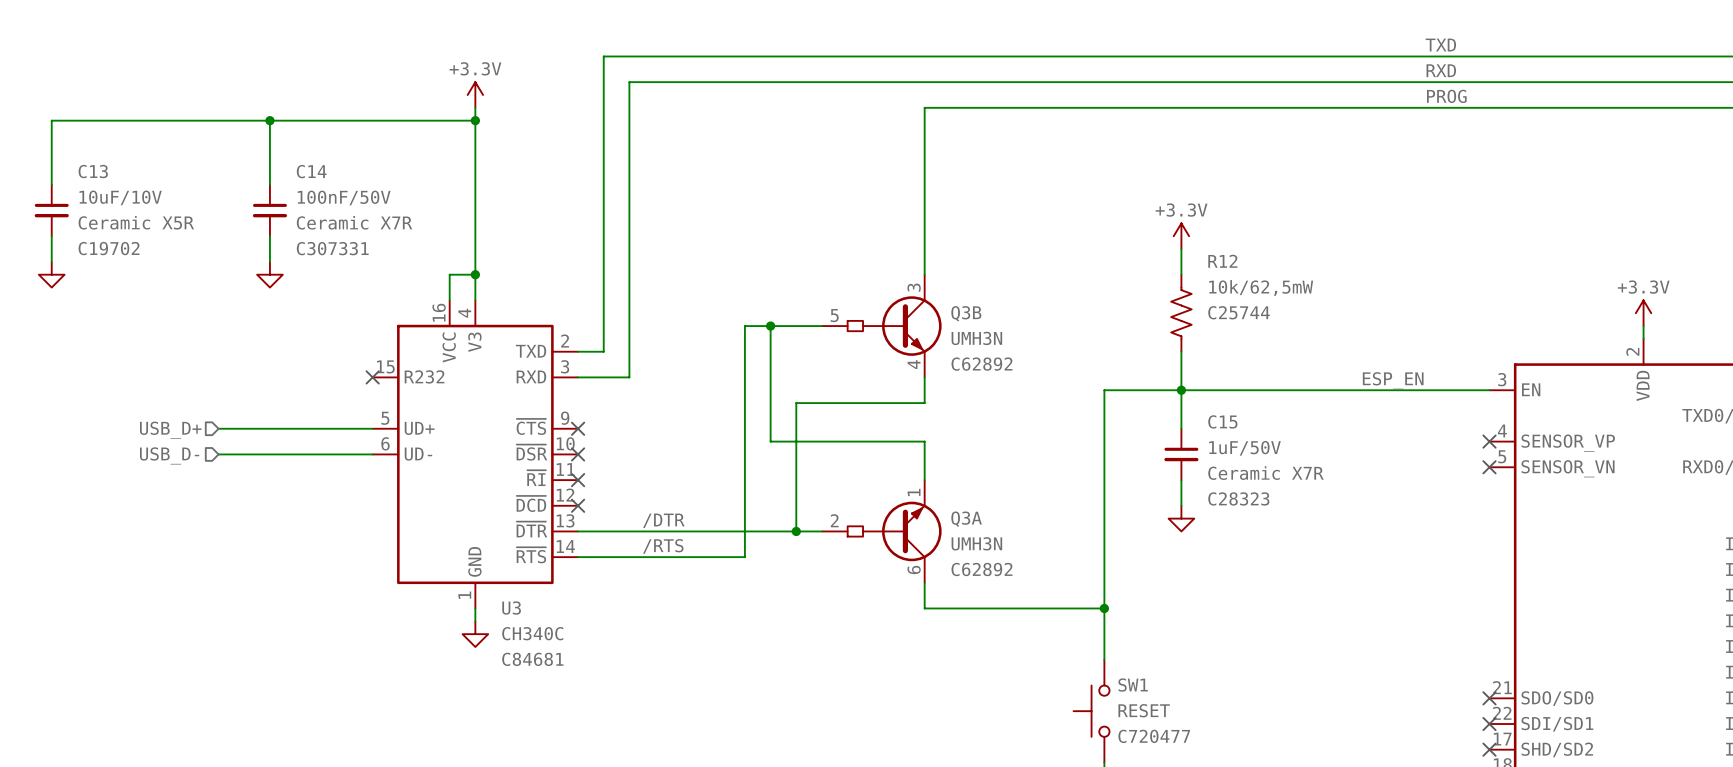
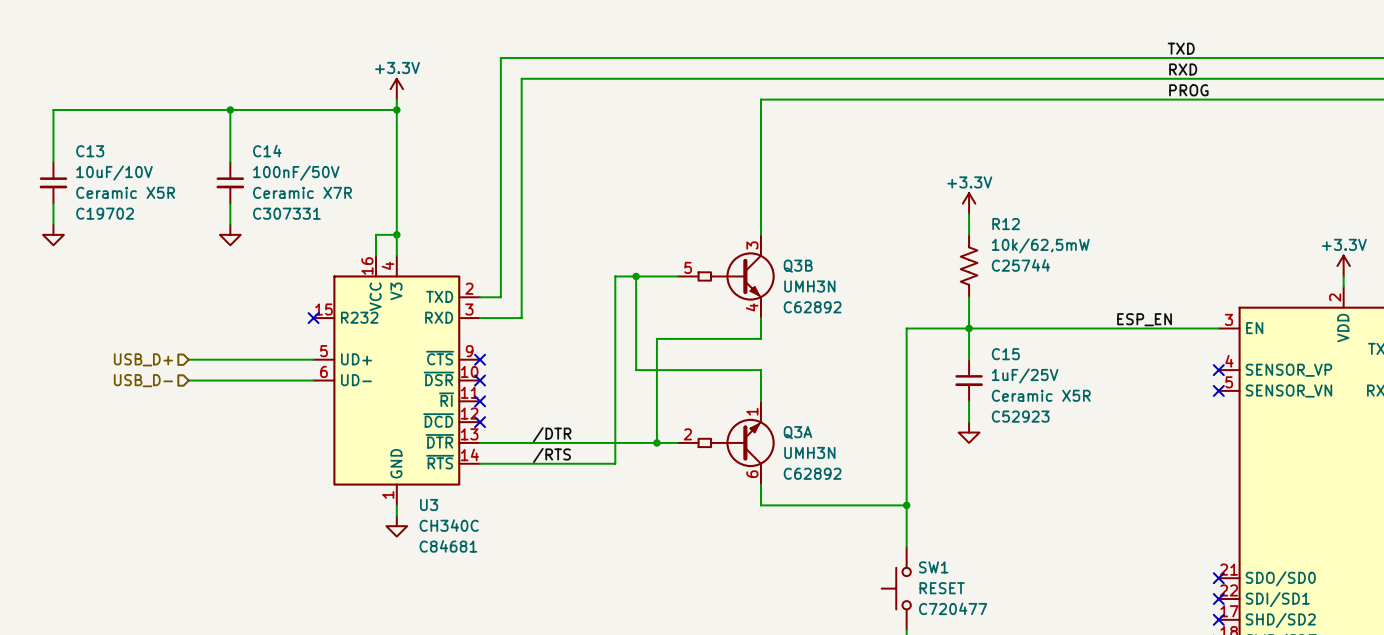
C15 value: 1uF/50V (1245, 448) -> 1uF/25V (1025, 375)
C15 text: Ceramic X7R (1265, 473) -> Ceramic X5R (1041, 395)
C15 text: C28323 (1238, 498) -> C52923 (1020, 416)

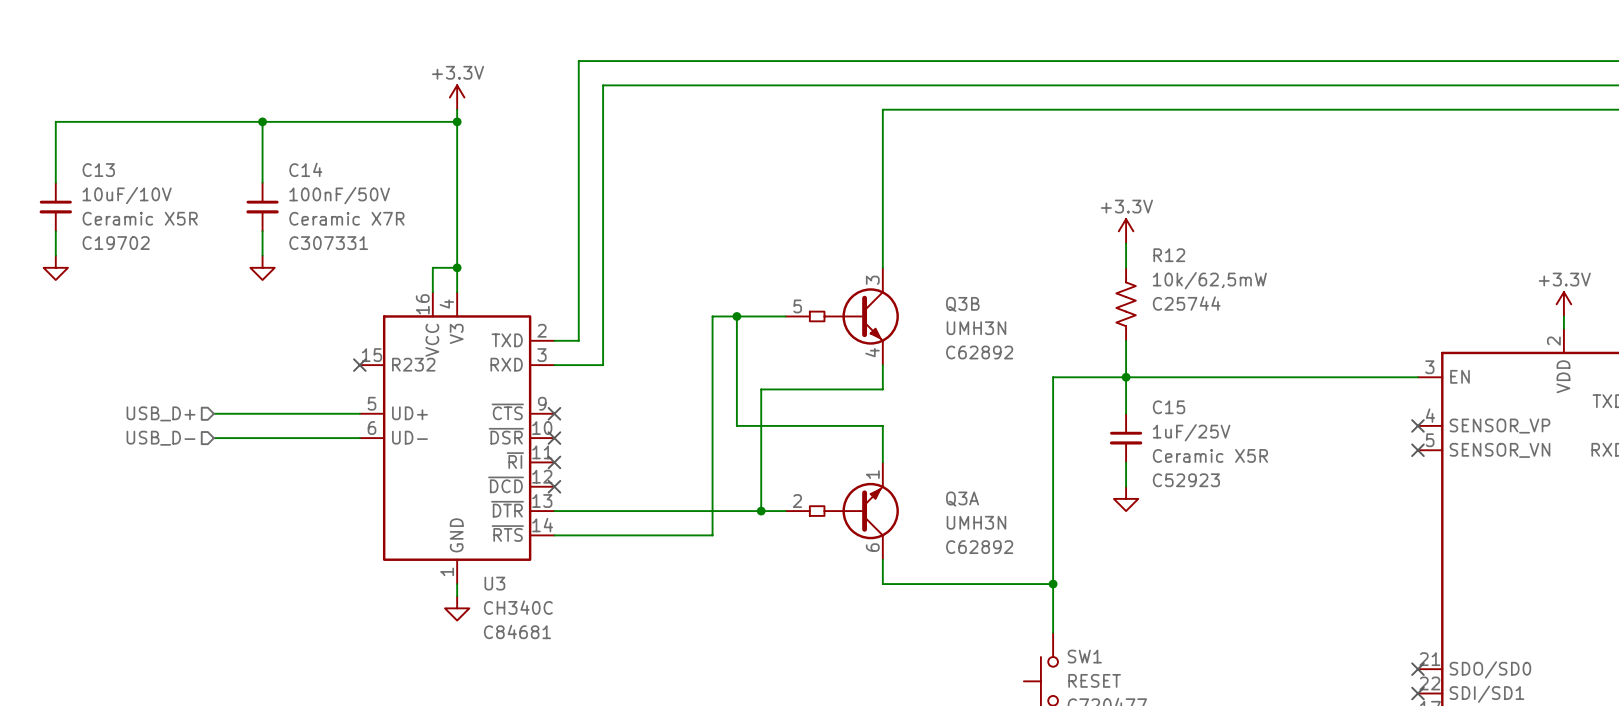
label: TXD (1181, 48) -> none
label: RXD (1183, 69) -> none
label: PROG (1188, 90) -> none
Q3B name position: Q3B (798, 266) -> Q3B (962, 304)
Q3B value position: UMH3N (809, 286) -> UMH3N (976, 328)
Q3B text position: C62892 (812, 307) -> C62892 (979, 352)
label: ESP_EN (1144, 319) -> none
Q3A name position: Q3A (797, 432) -> Q3A (962, 499)
label: /DTR (552, 434) -> none
Q3A value position: UMH3N (809, 452) -> UMH3N (976, 522)
label: /RTS (551, 455) -> none
Q3A text position: C62892 (812, 473) -> C62892 (979, 547)

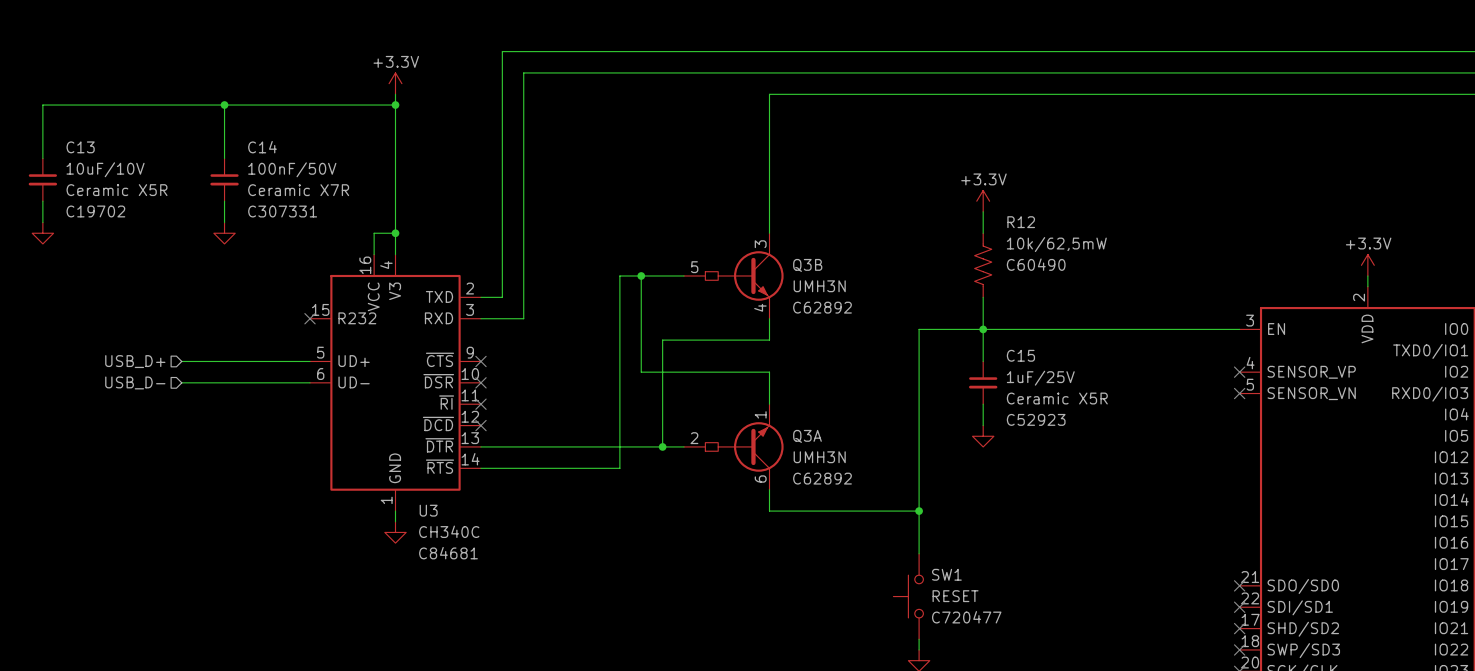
R12 text: C25744 (1186, 303) -> C60490 (1036, 264)
Q3B name position: Q3B (962, 304) -> Q3B (807, 265)
Q3B value position: UMH3N (976, 328) -> UMH3N (819, 286)
Q3B text position: C62892 (979, 352) -> C62892 (822, 307)
Q3A name position: Q3A (962, 499) -> Q3A (807, 436)
Q3A value position: UMH3N (976, 522) -> UMH3N (819, 457)
Q3A text position: C62892 (979, 547) -> C62892 (822, 478)

